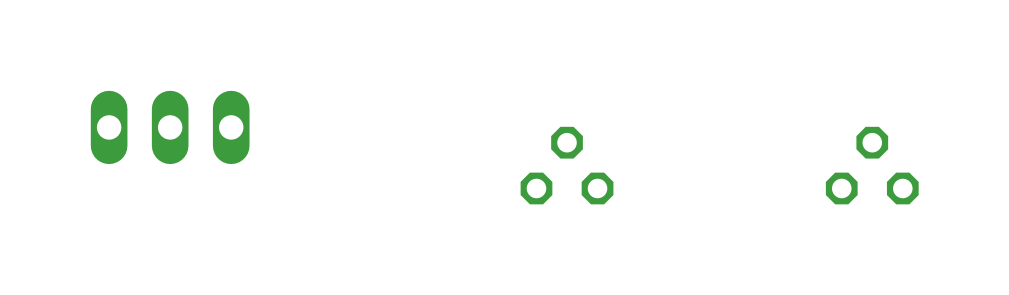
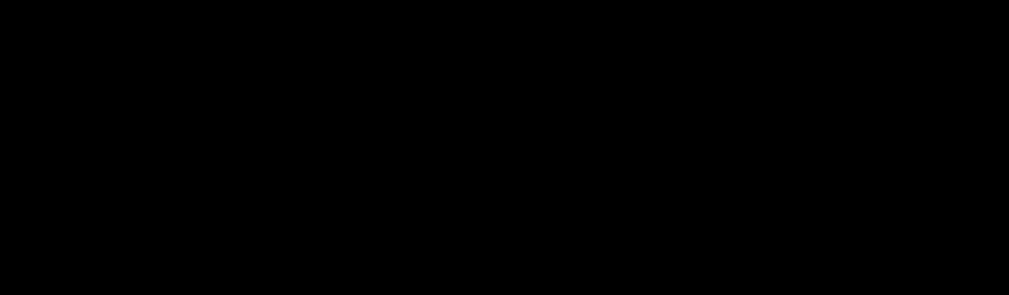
part: (170, 127) -> none
part: (567, 165) -> none
part: (872, 165) -> none

